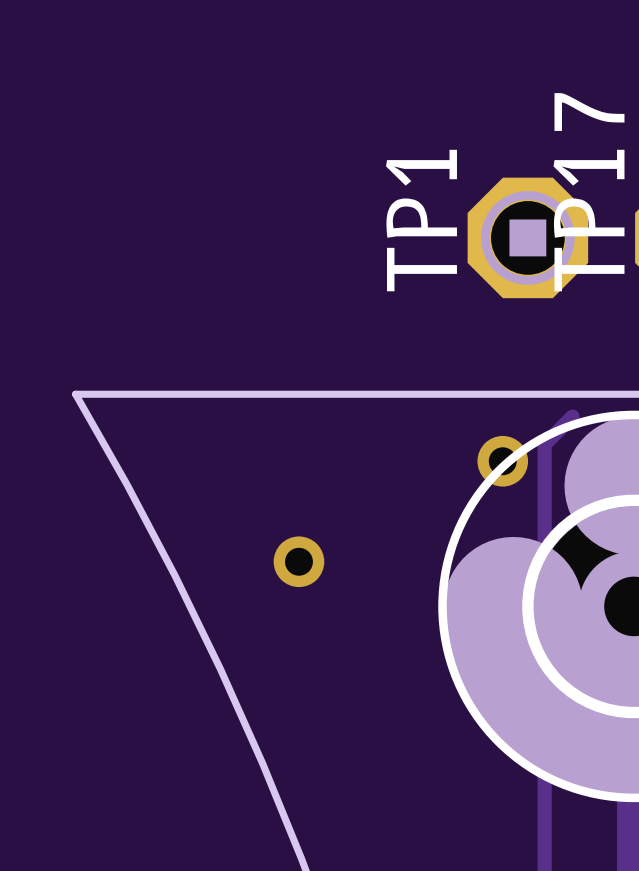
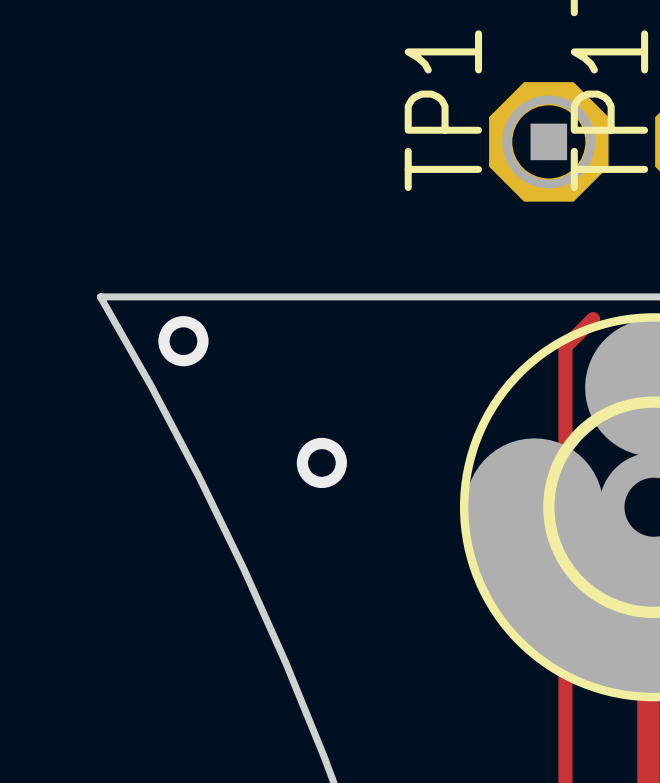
via: none -> (183, 341)
via: (502, 461) -> none

